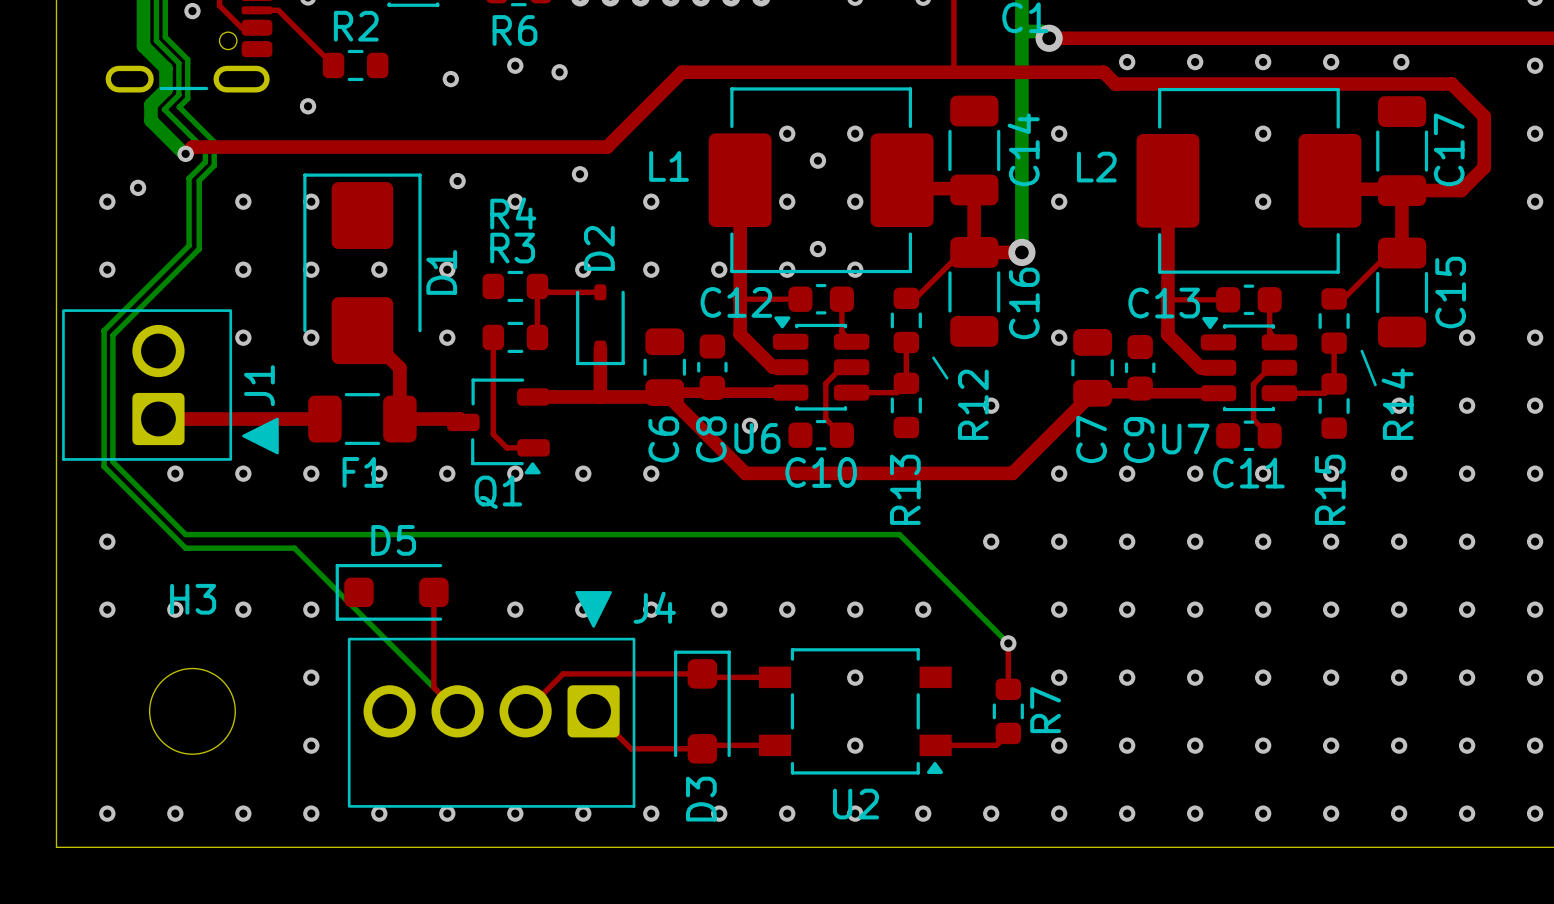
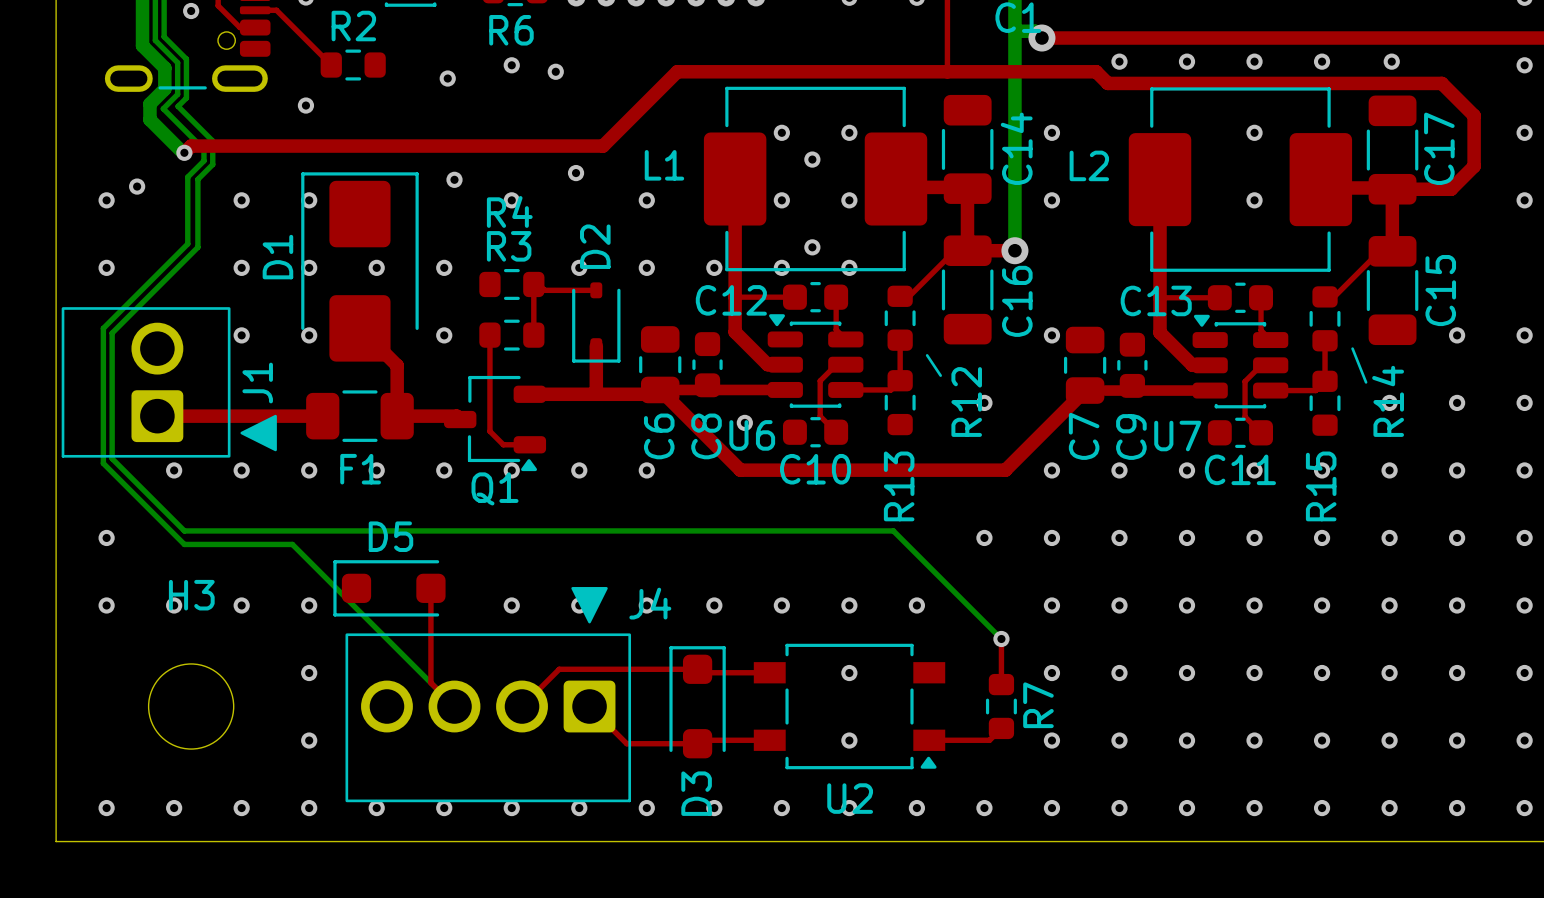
D1 name position: D1 (441, 272) -> D1 (277, 257)

